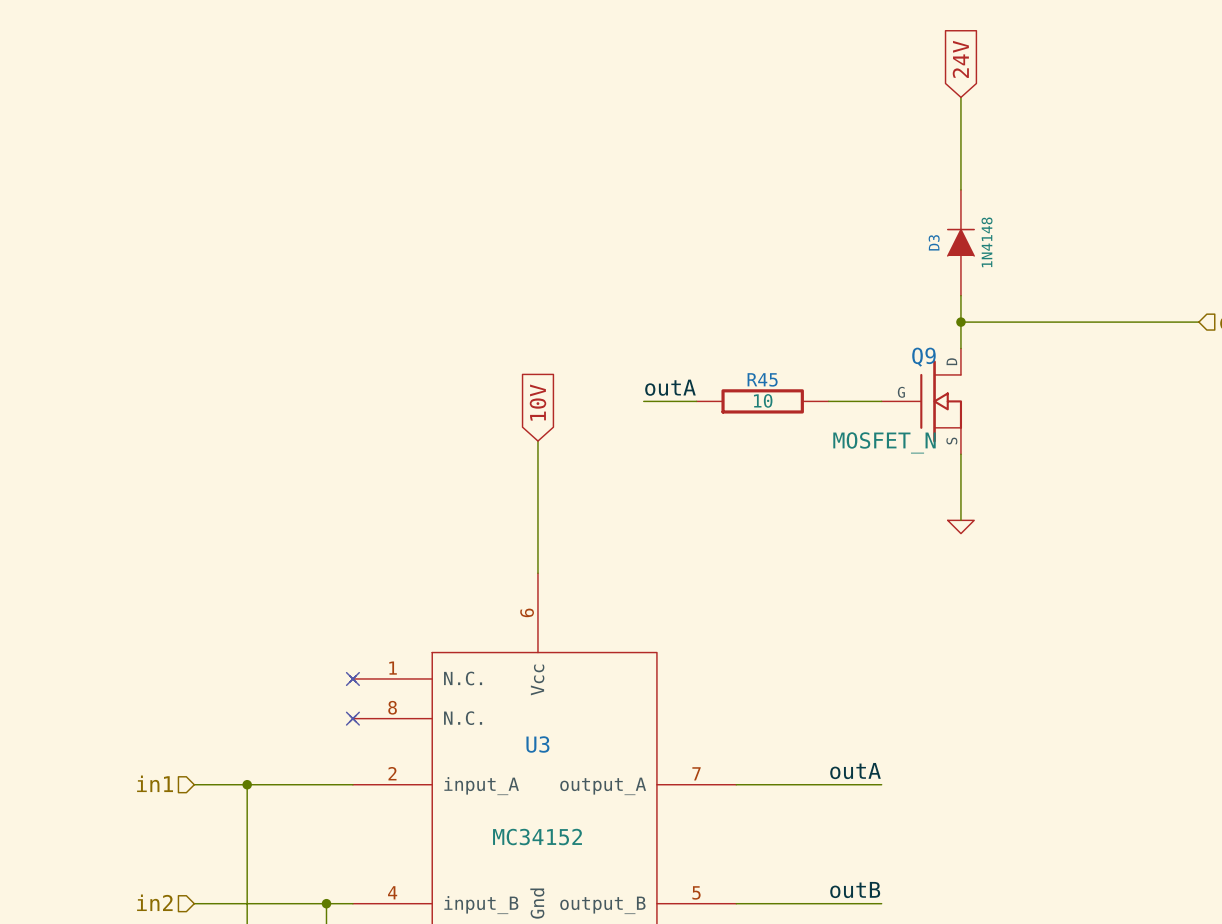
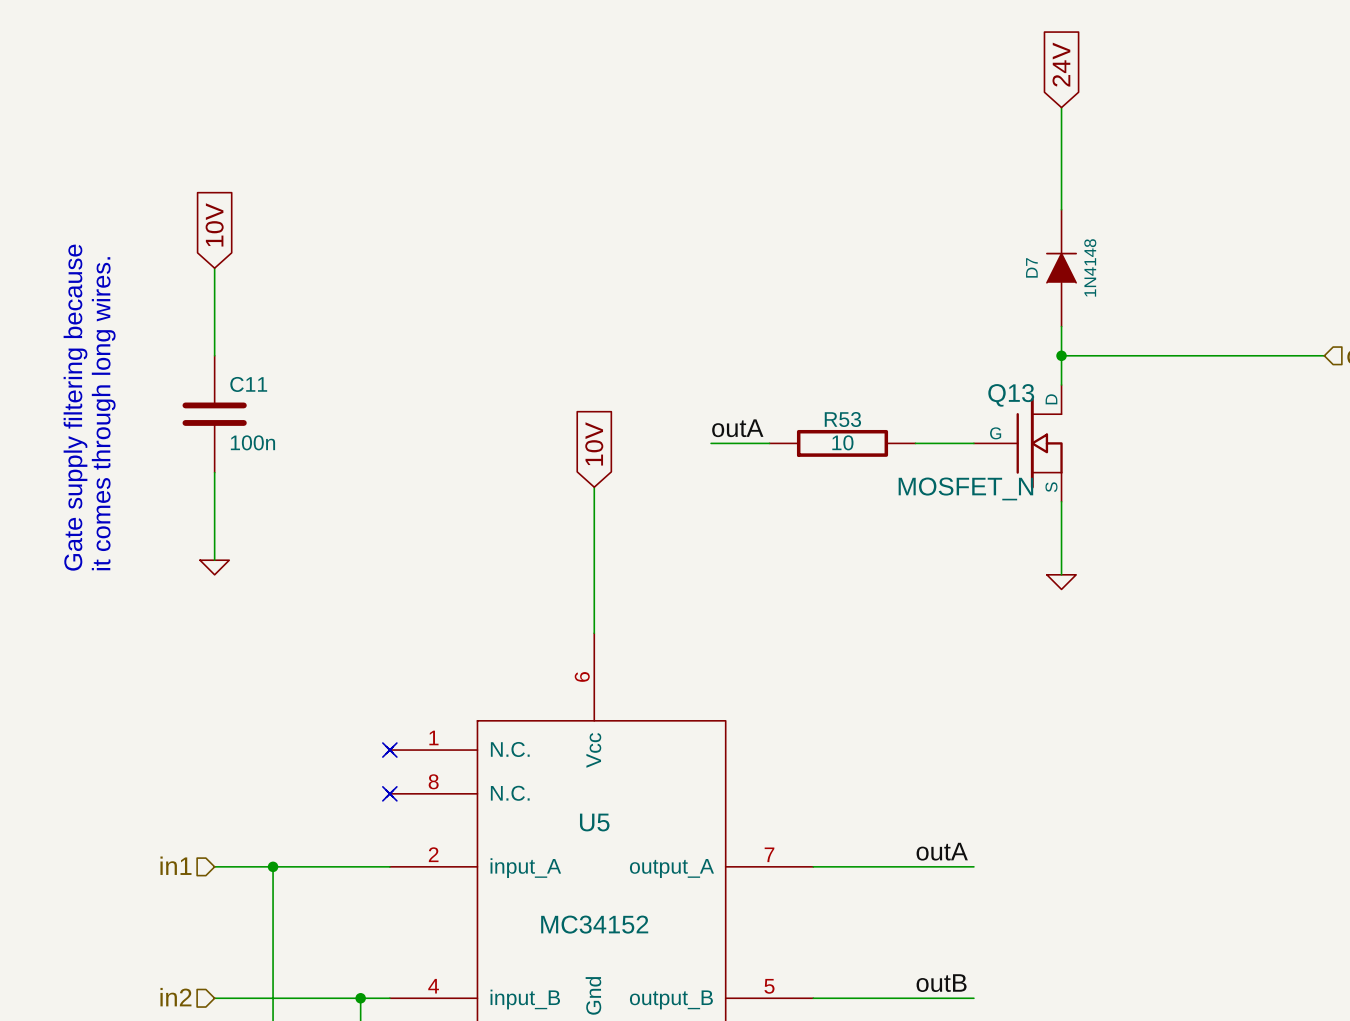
global label: none -> 10V (214, 224)
wire: none -> (214, 268) (214, 355)
D3 name: D3 (934, 242) -> D7 (1031, 267)
text: none -> Gate supply filtering because (75, 407)
text: none -> it comes through long wires. (103, 413)
Q9 name: Q9 (923, 357) -> Q13 (1011, 395)
C11: none -> 100n (214, 414)
R45 name: R45 (762, 379) -> R53 (842, 419)
wire: none -> (214, 472) (214, 560)
power symbol: none -> (214, 567)
U3 name: U3 (537, 744) -> U5 (594, 822)

